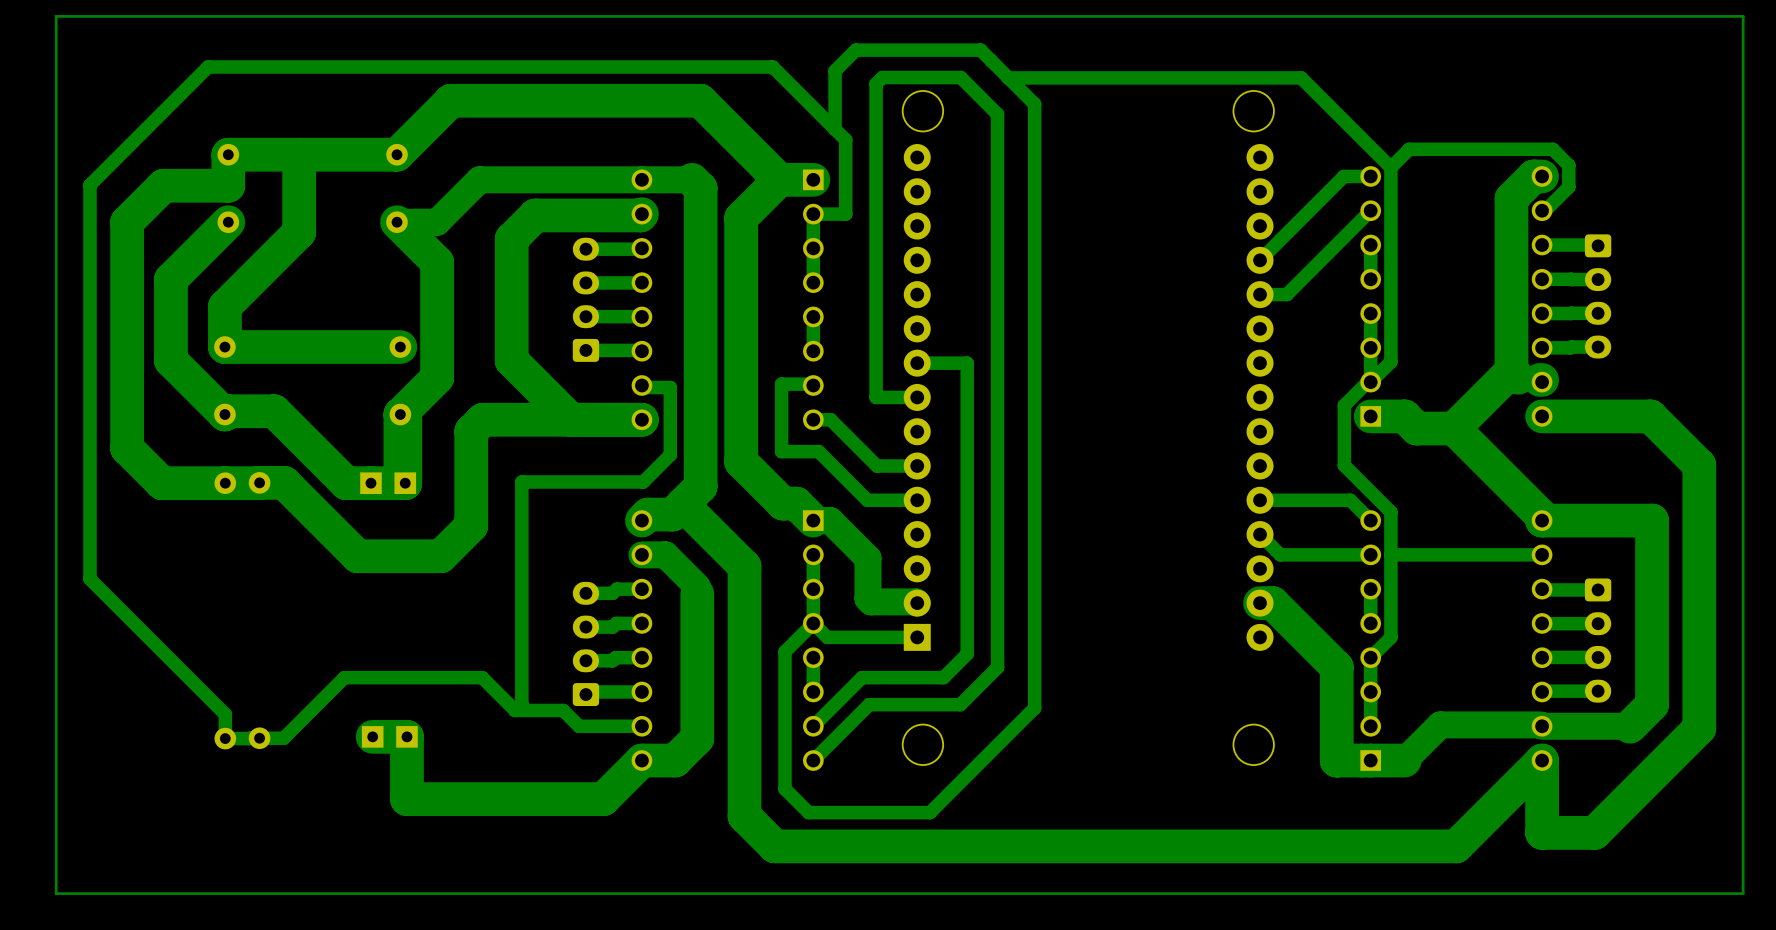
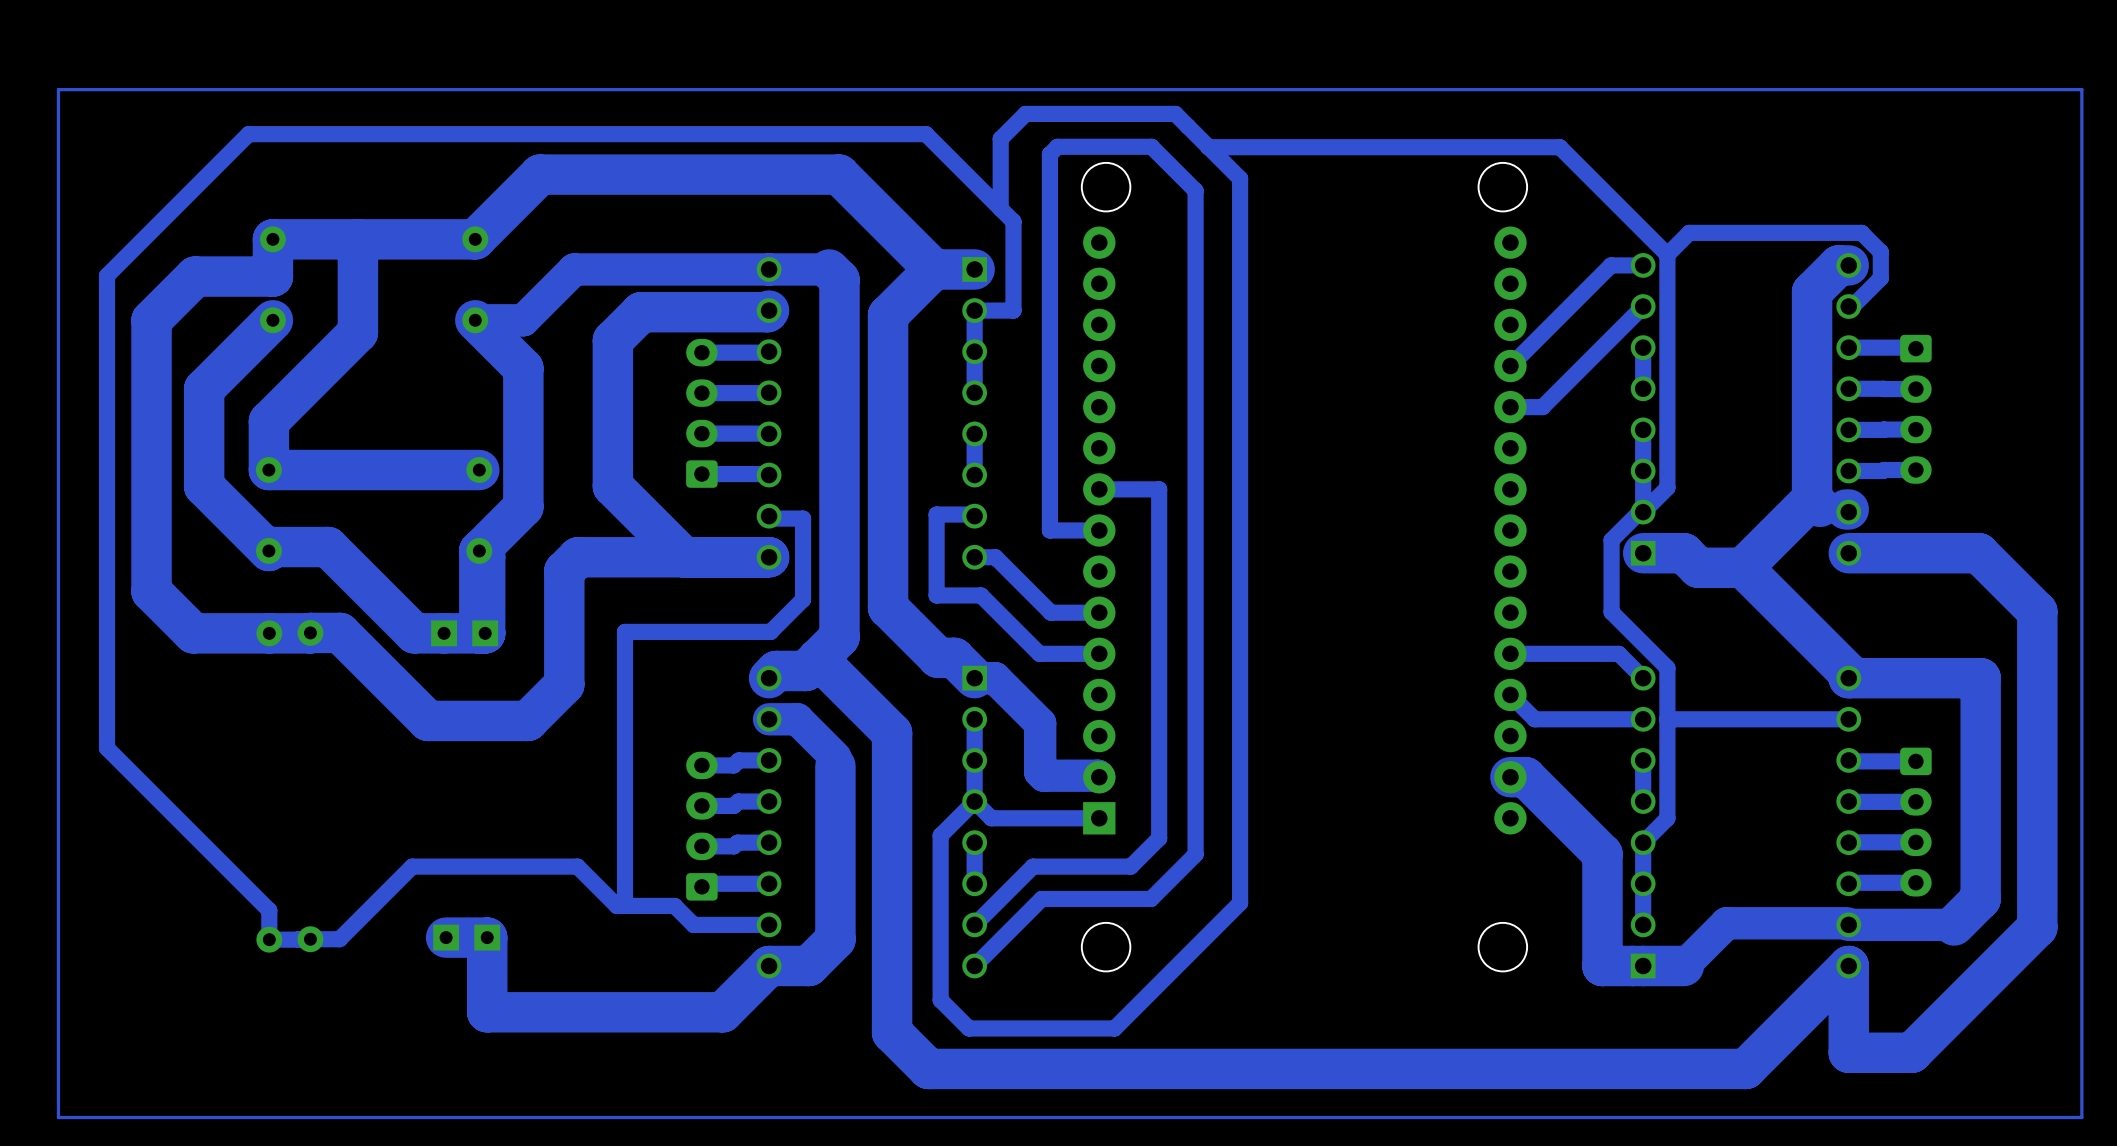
bottom track: (1743, 16) (56, 16) (56, 893) (1743, 893) (1743, 16) -> (2081, 89) (2081, 1117) (58, 1117) (58, 89) (2081, 89)

